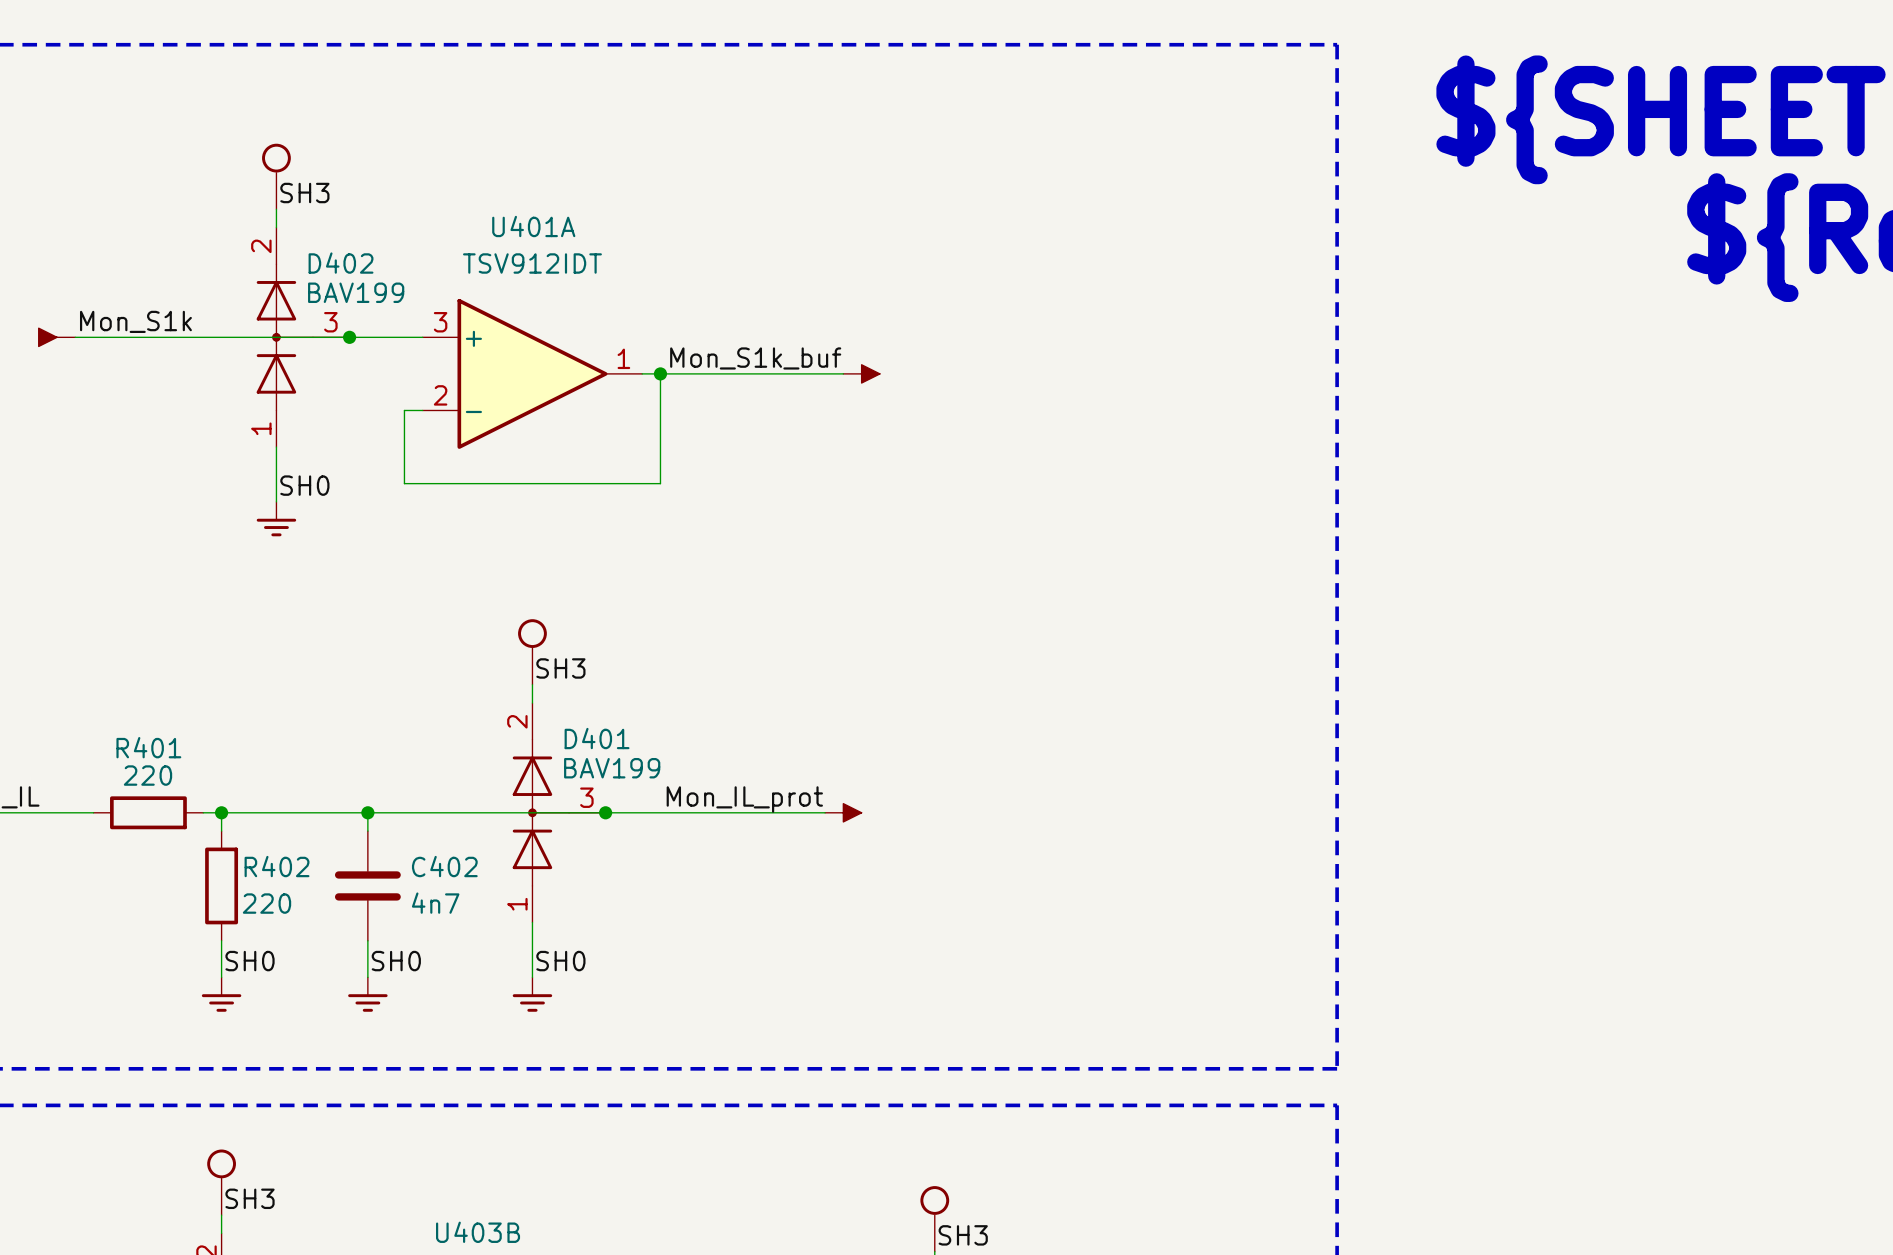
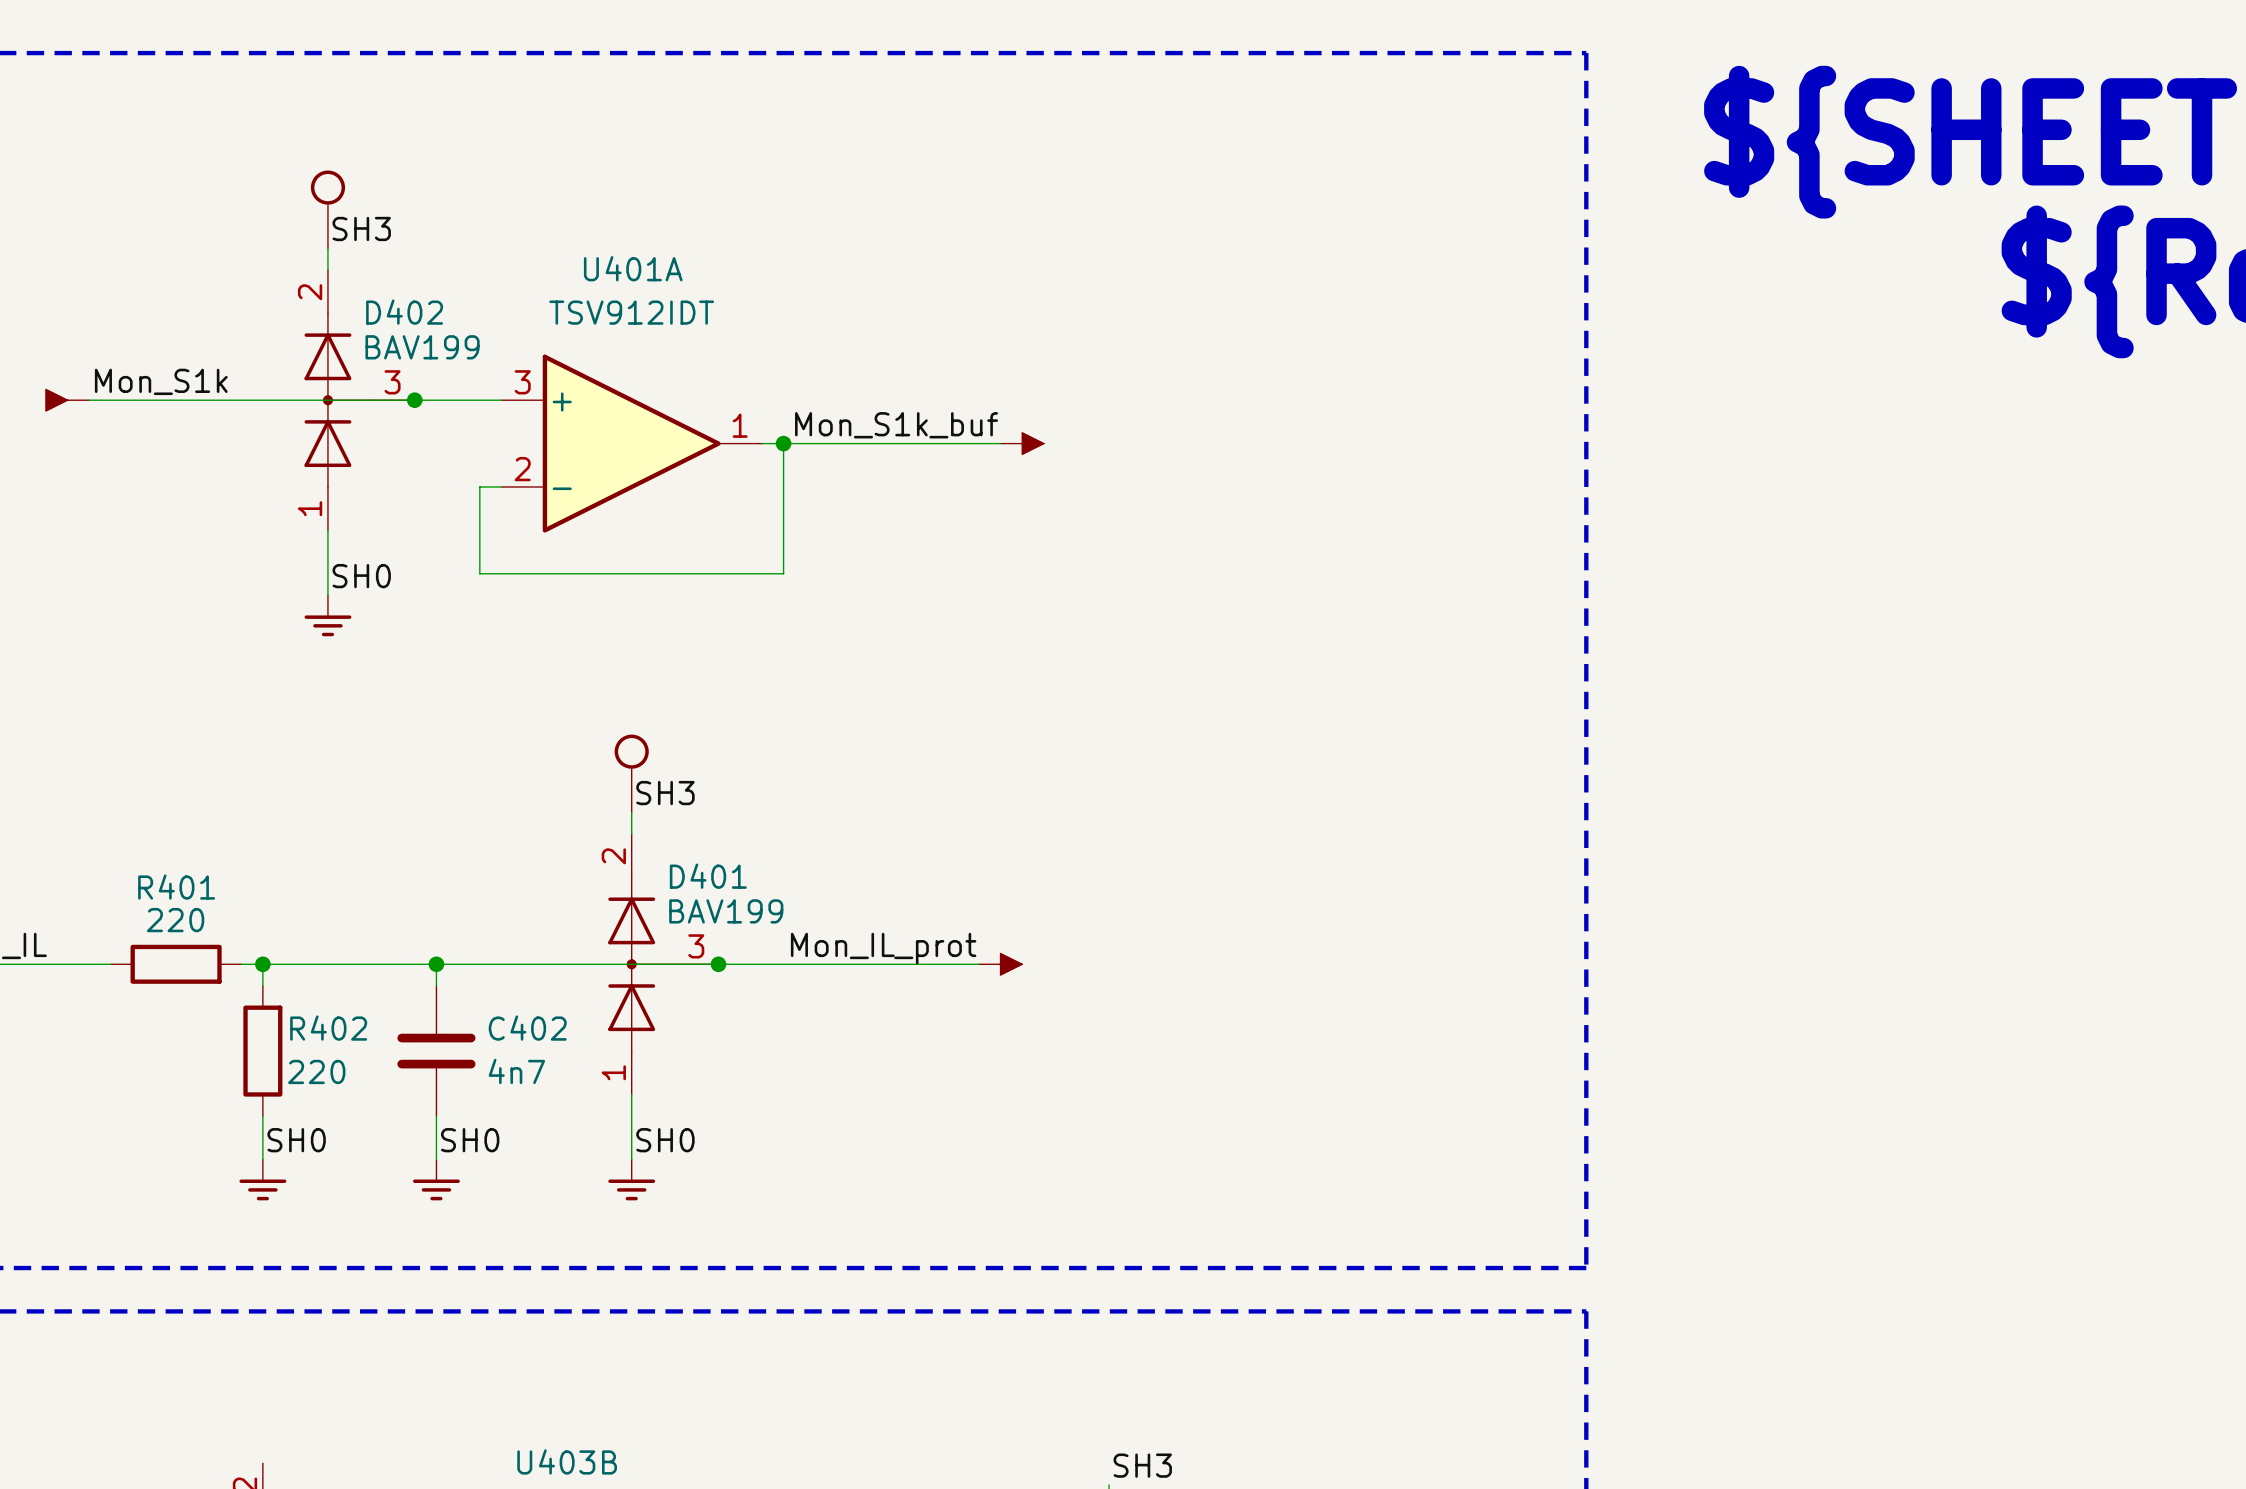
part: (221, 1182) -> none
label: SH3 (250, 1198) -> none
wire: (221, 1215) (221, 1233) -> none
part: (934, 1218) -> none

